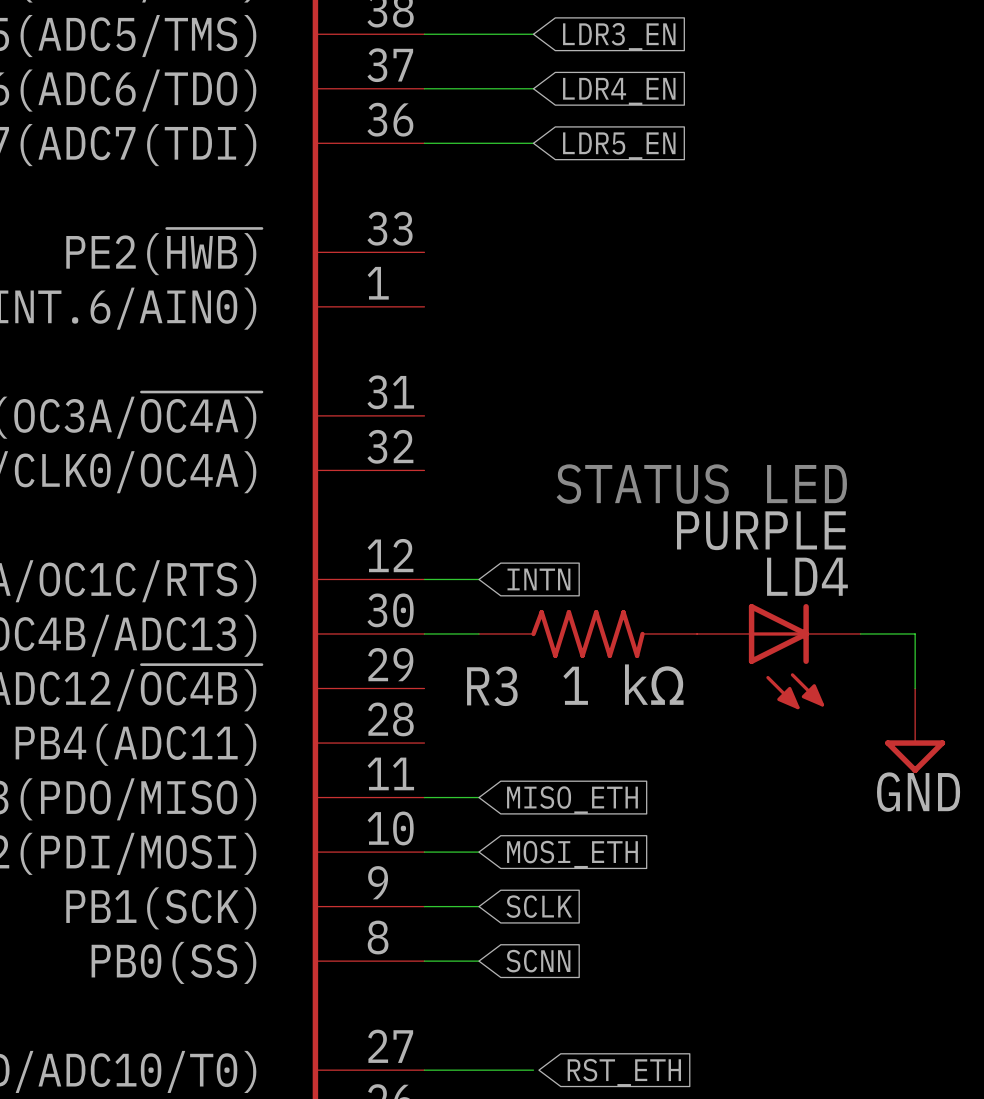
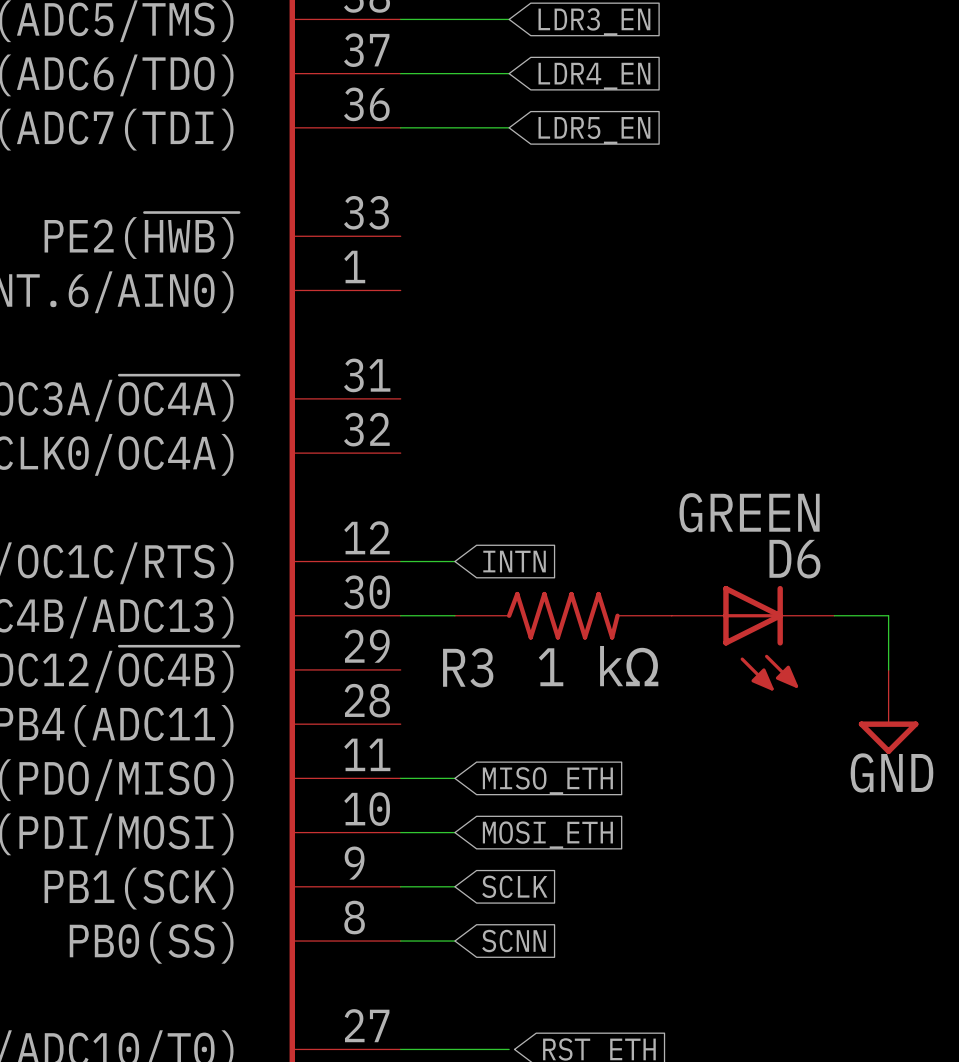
text: STATUS LED (701, 484) -> none
LD4 value: PURPLE (761, 530) -> GREEN (749, 512)
LD4 name: LD4 (807, 576) -> D6 (794, 559)

